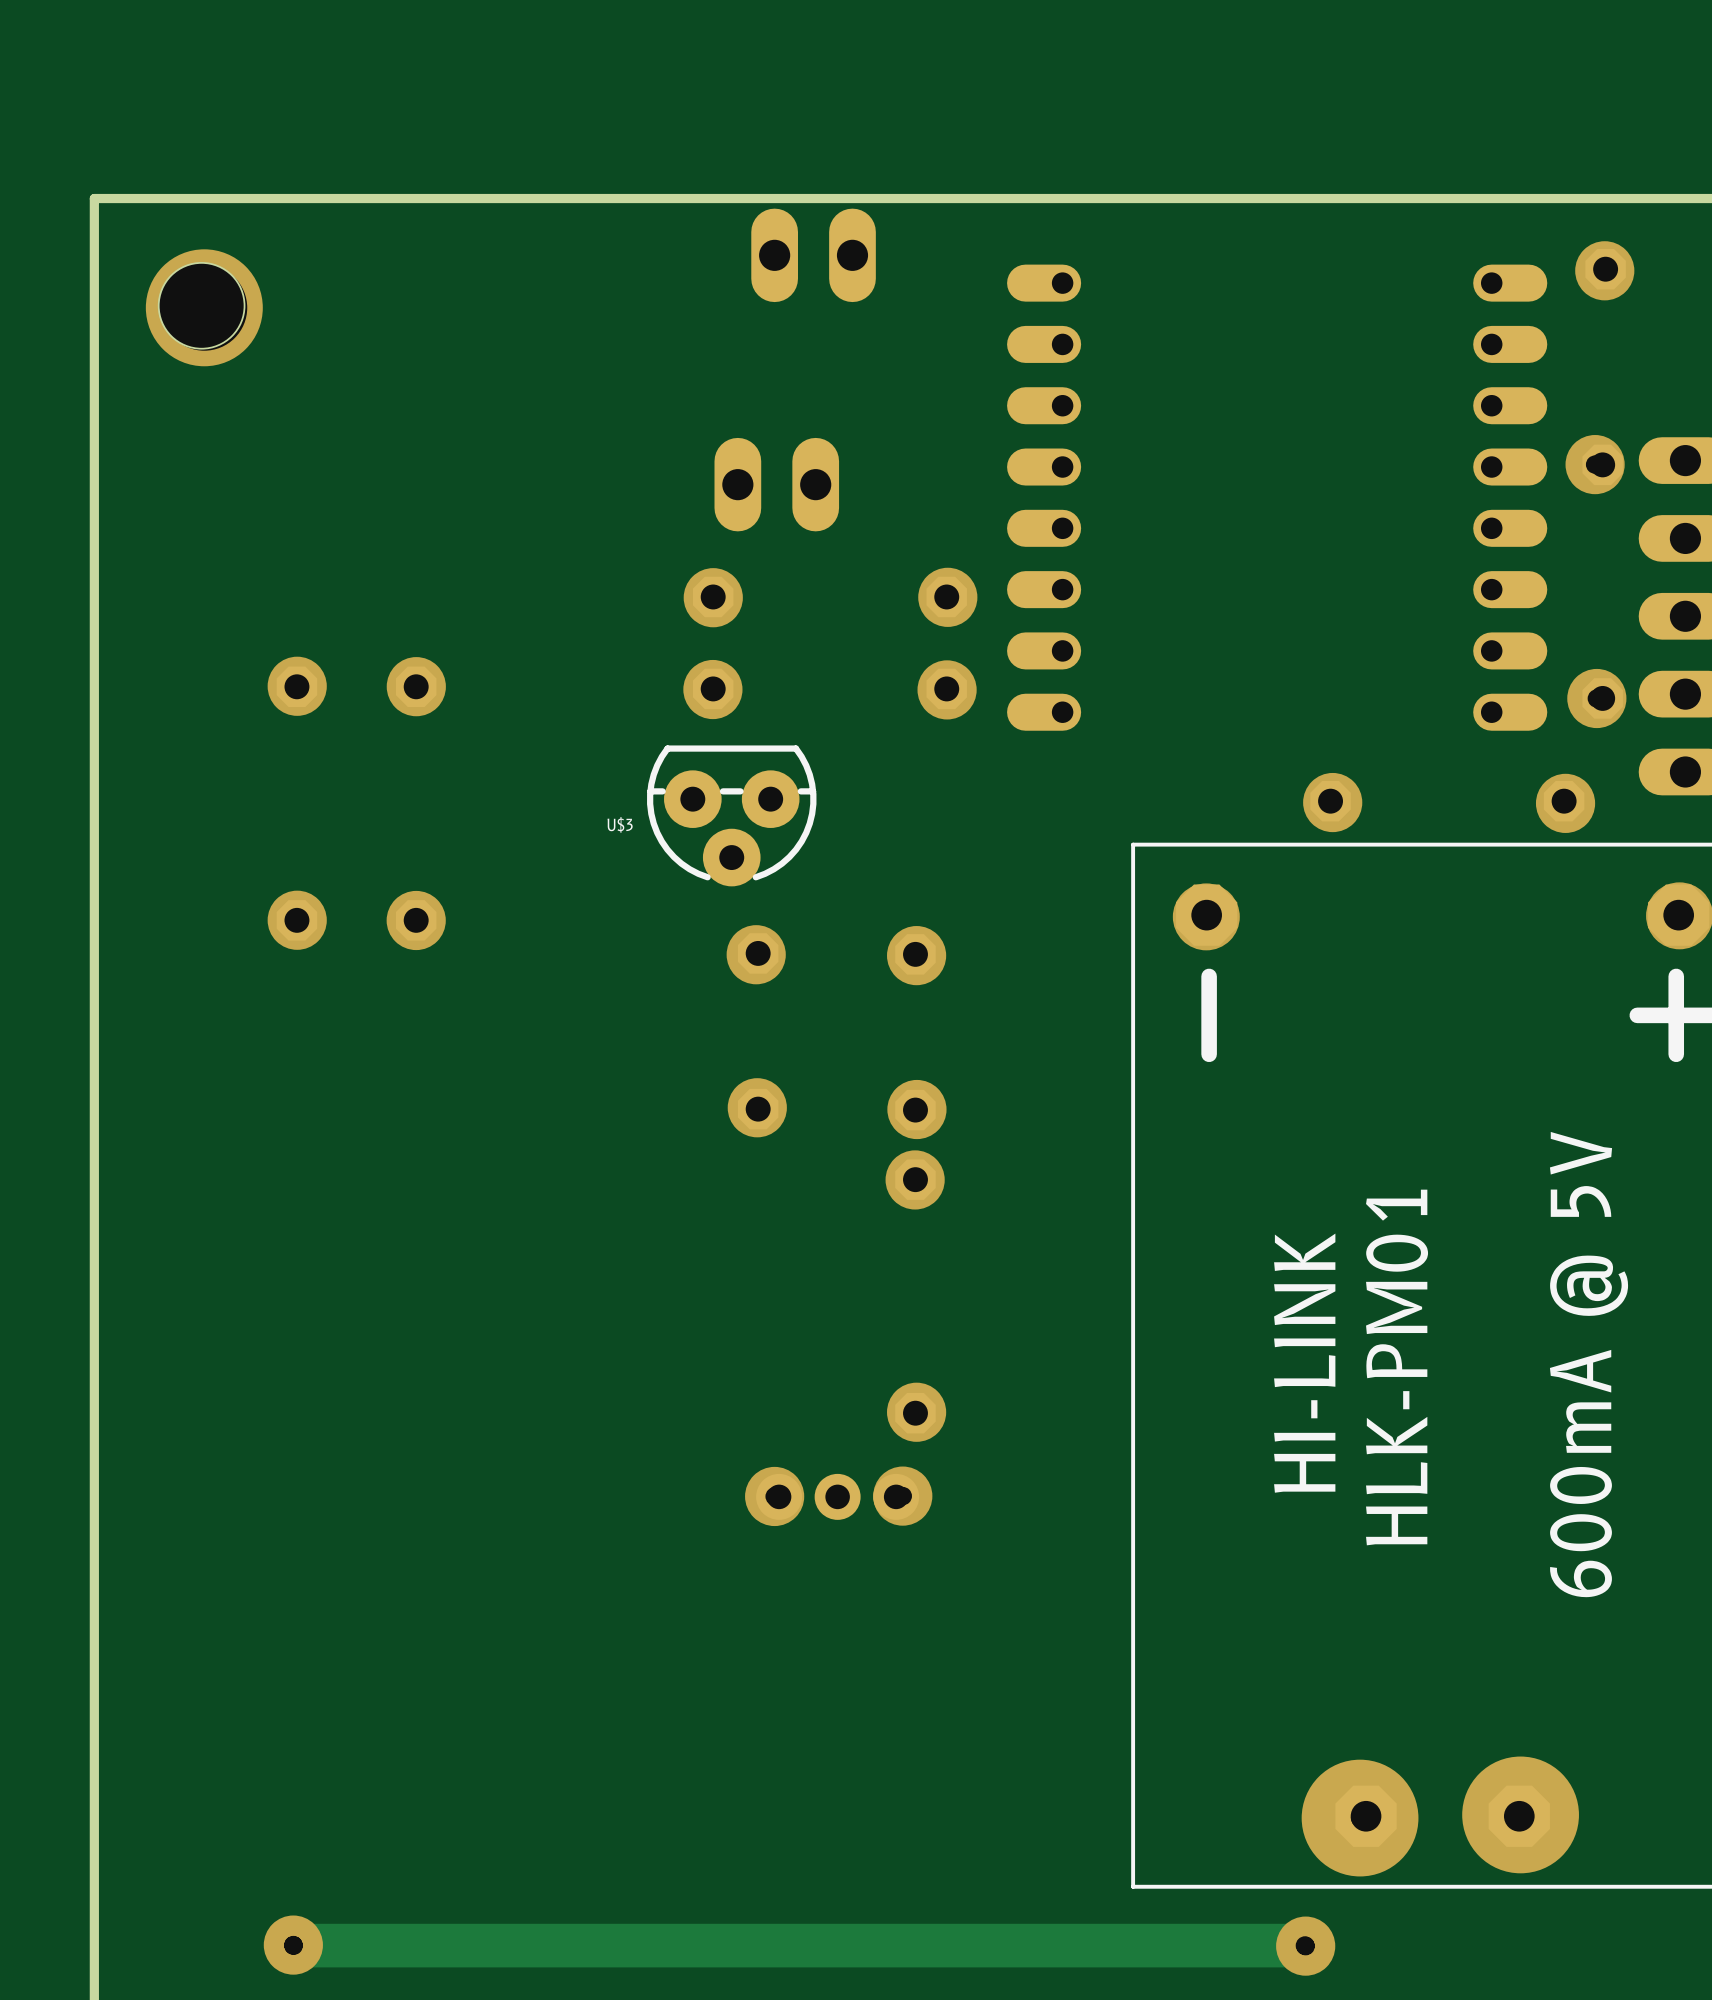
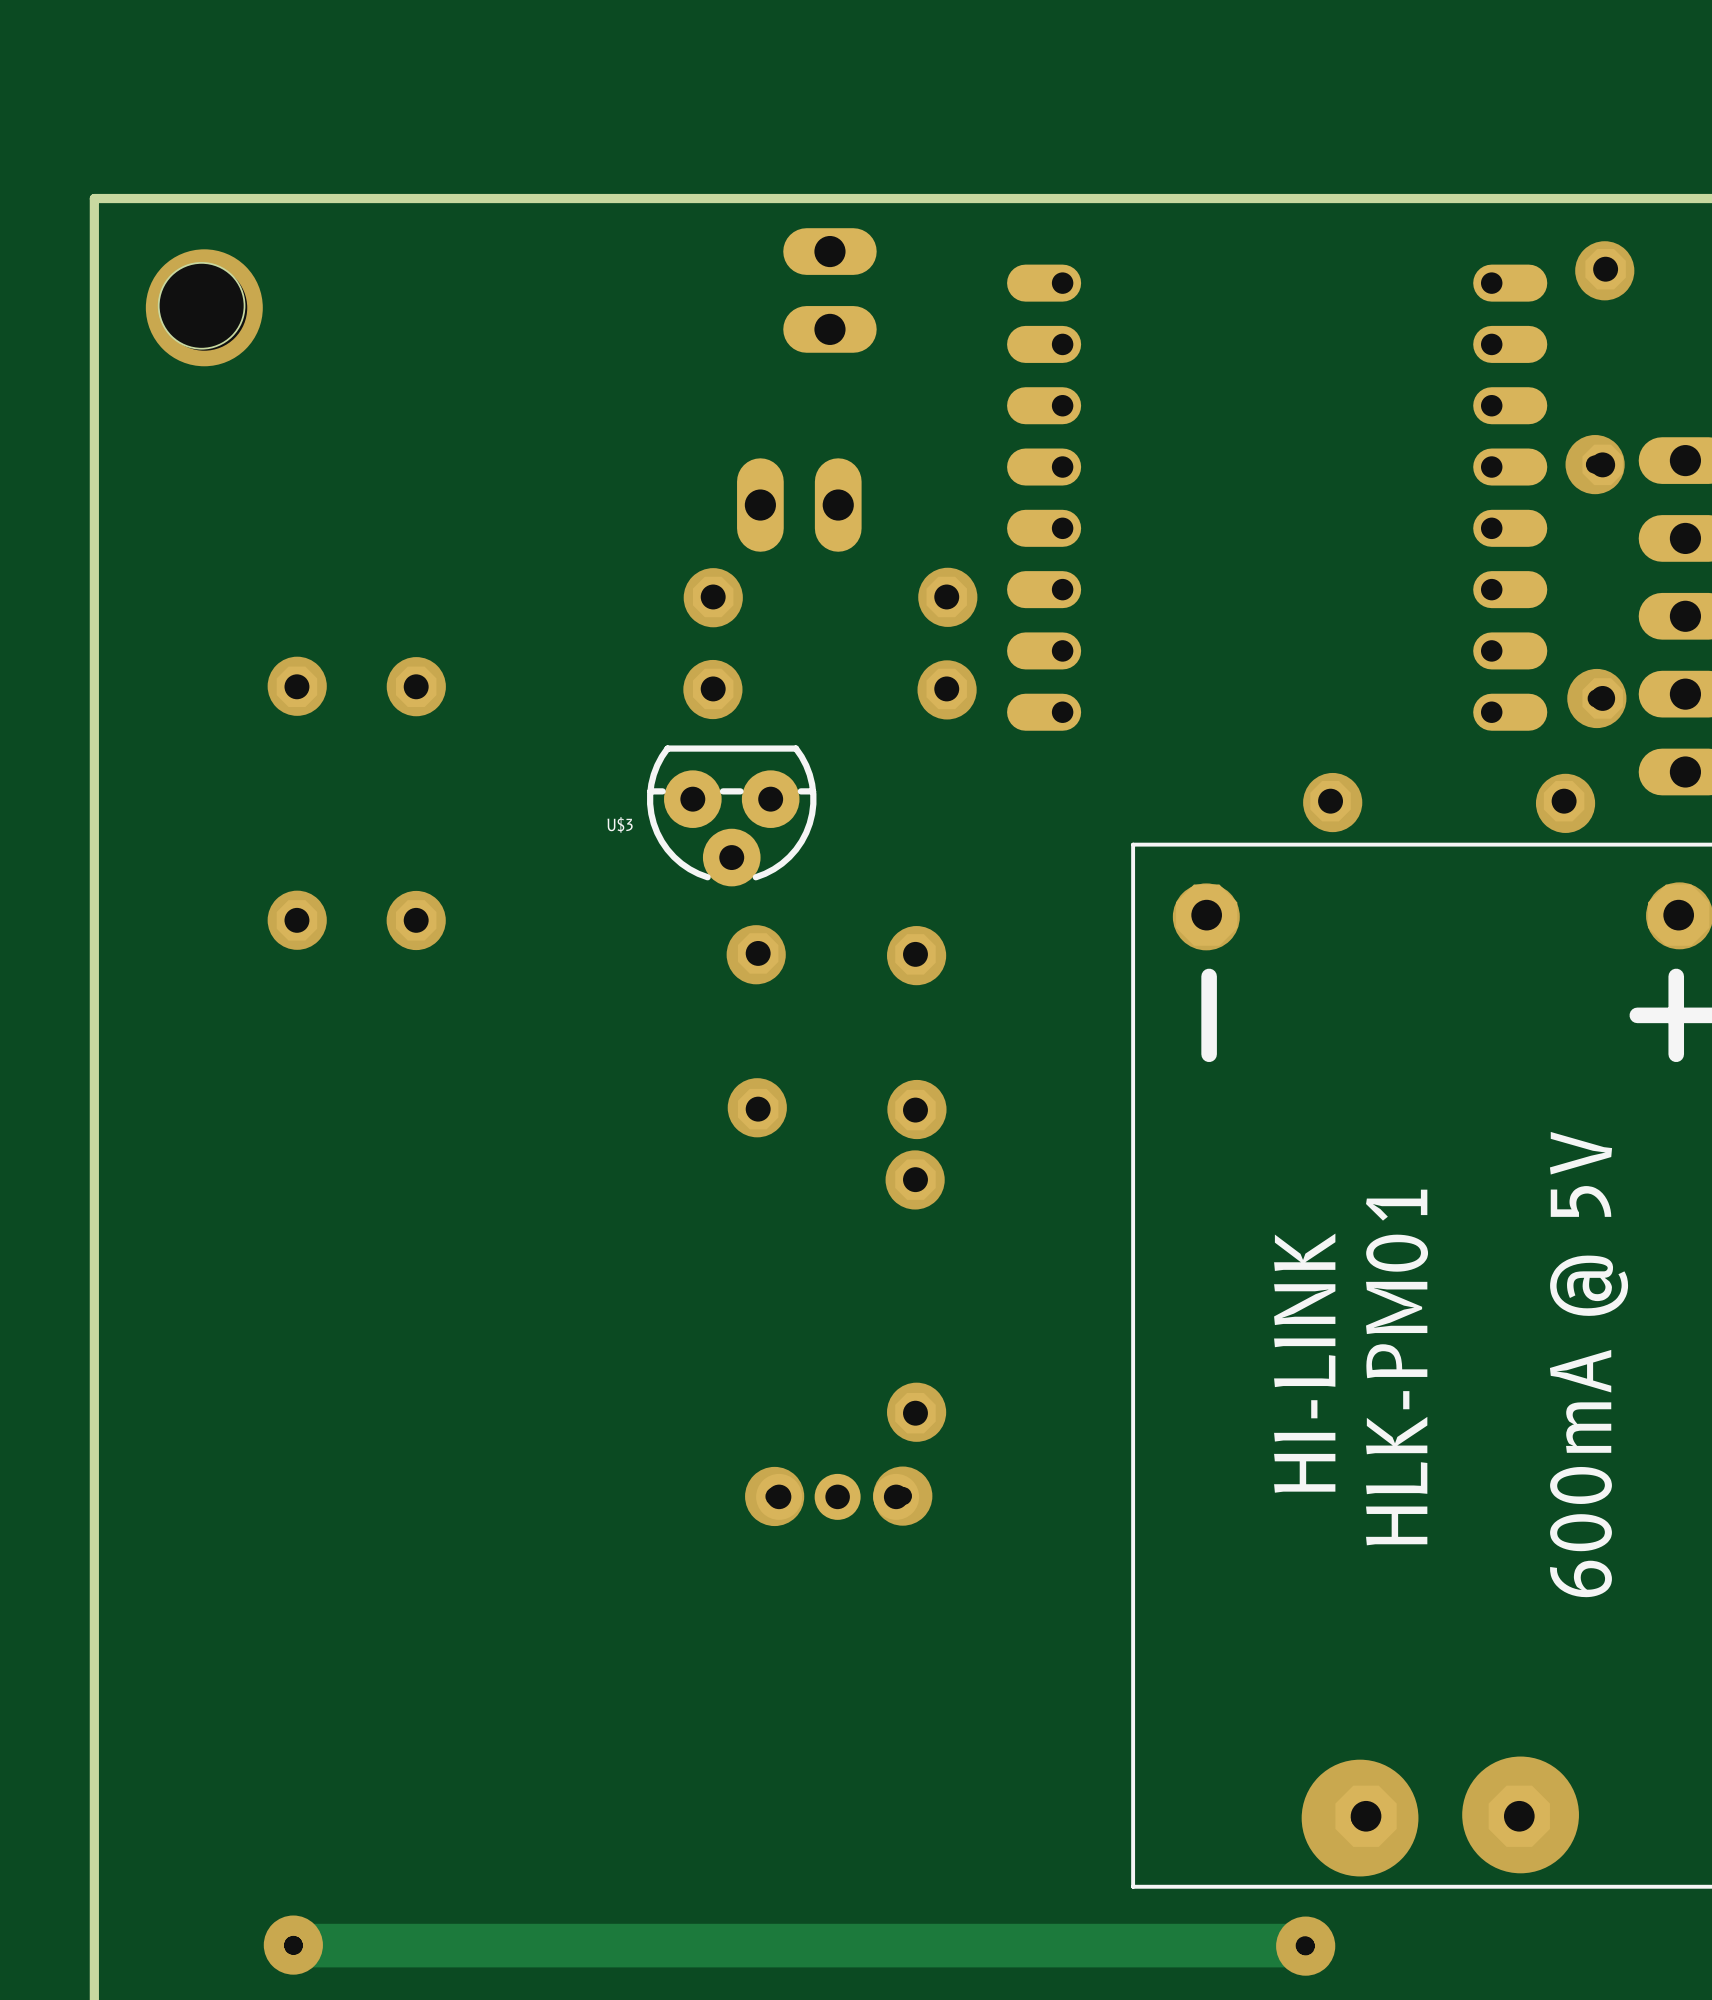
part rotation: 0° (813, 255) -> 90° clockwise (829, 290)
part position: (776, 484) -> (799, 505)

